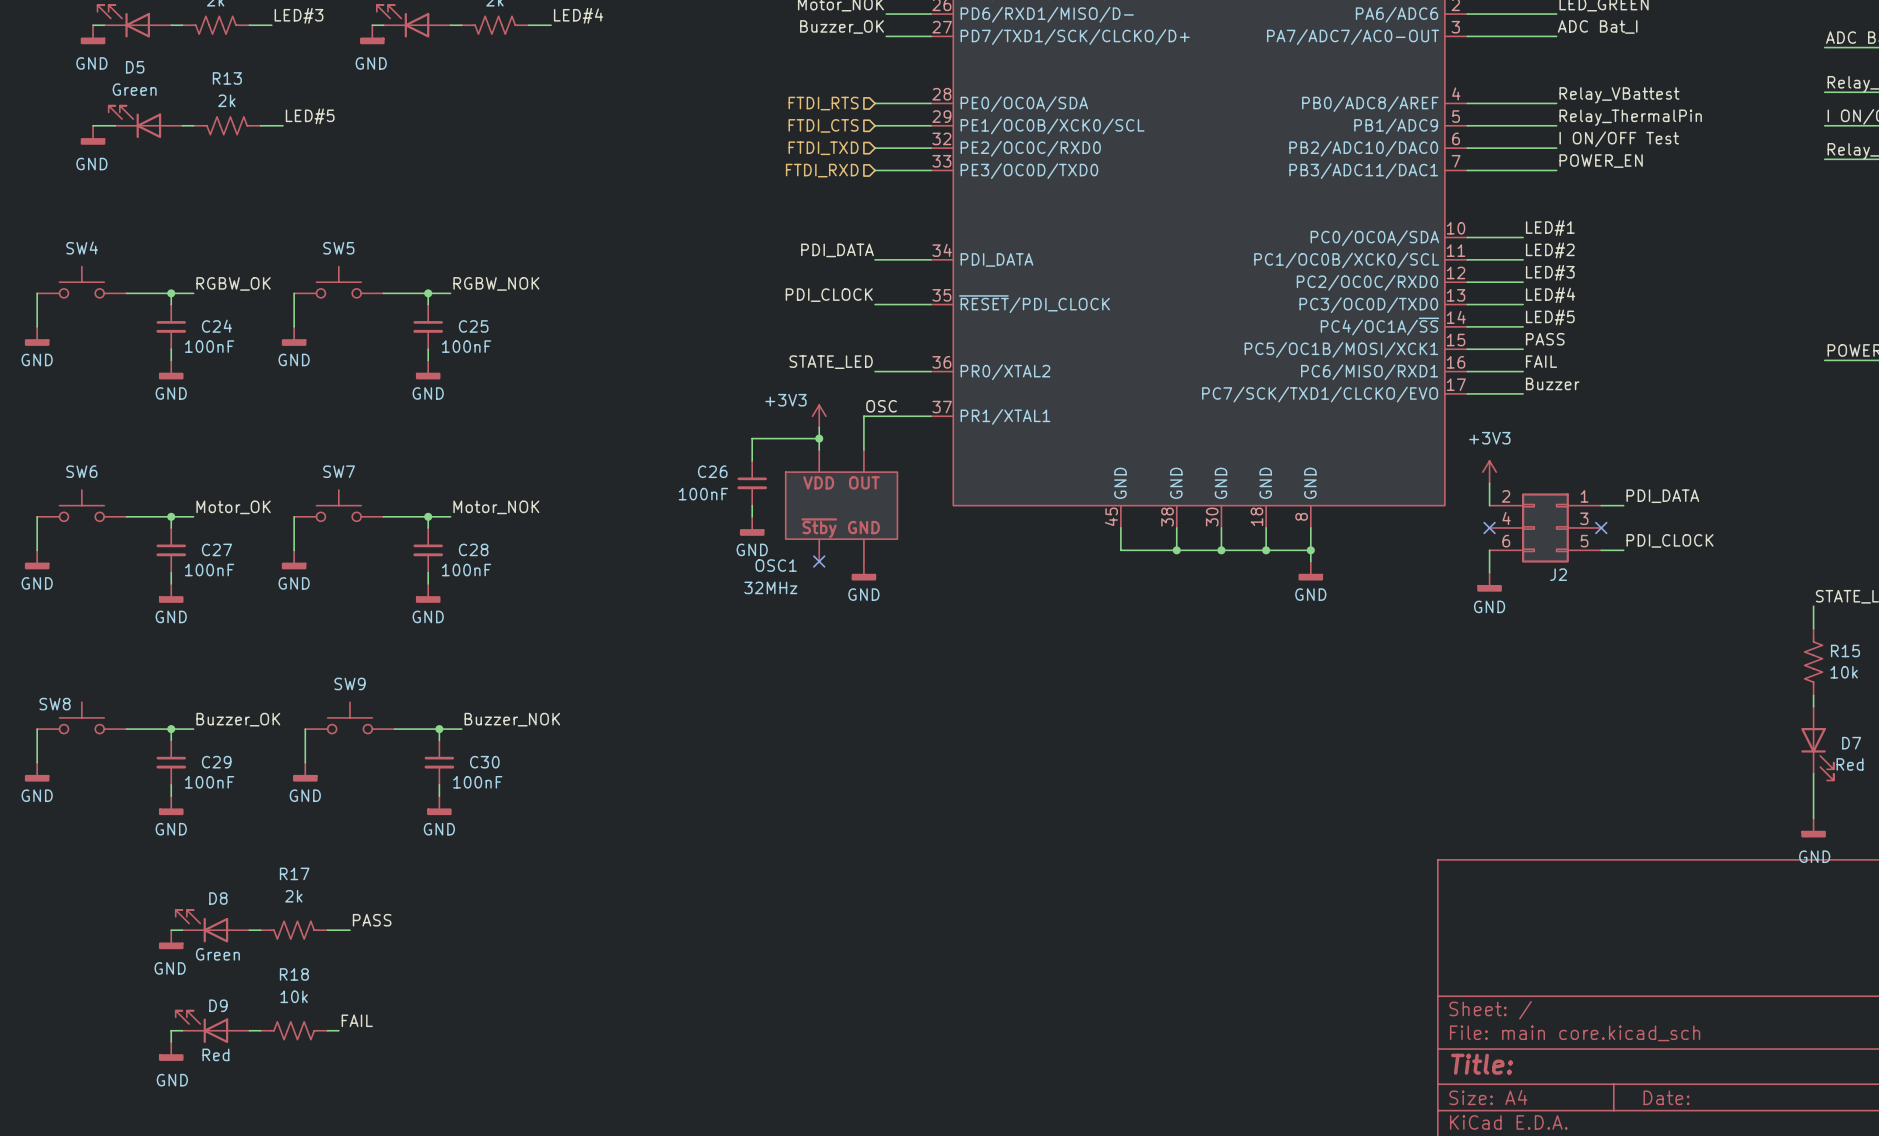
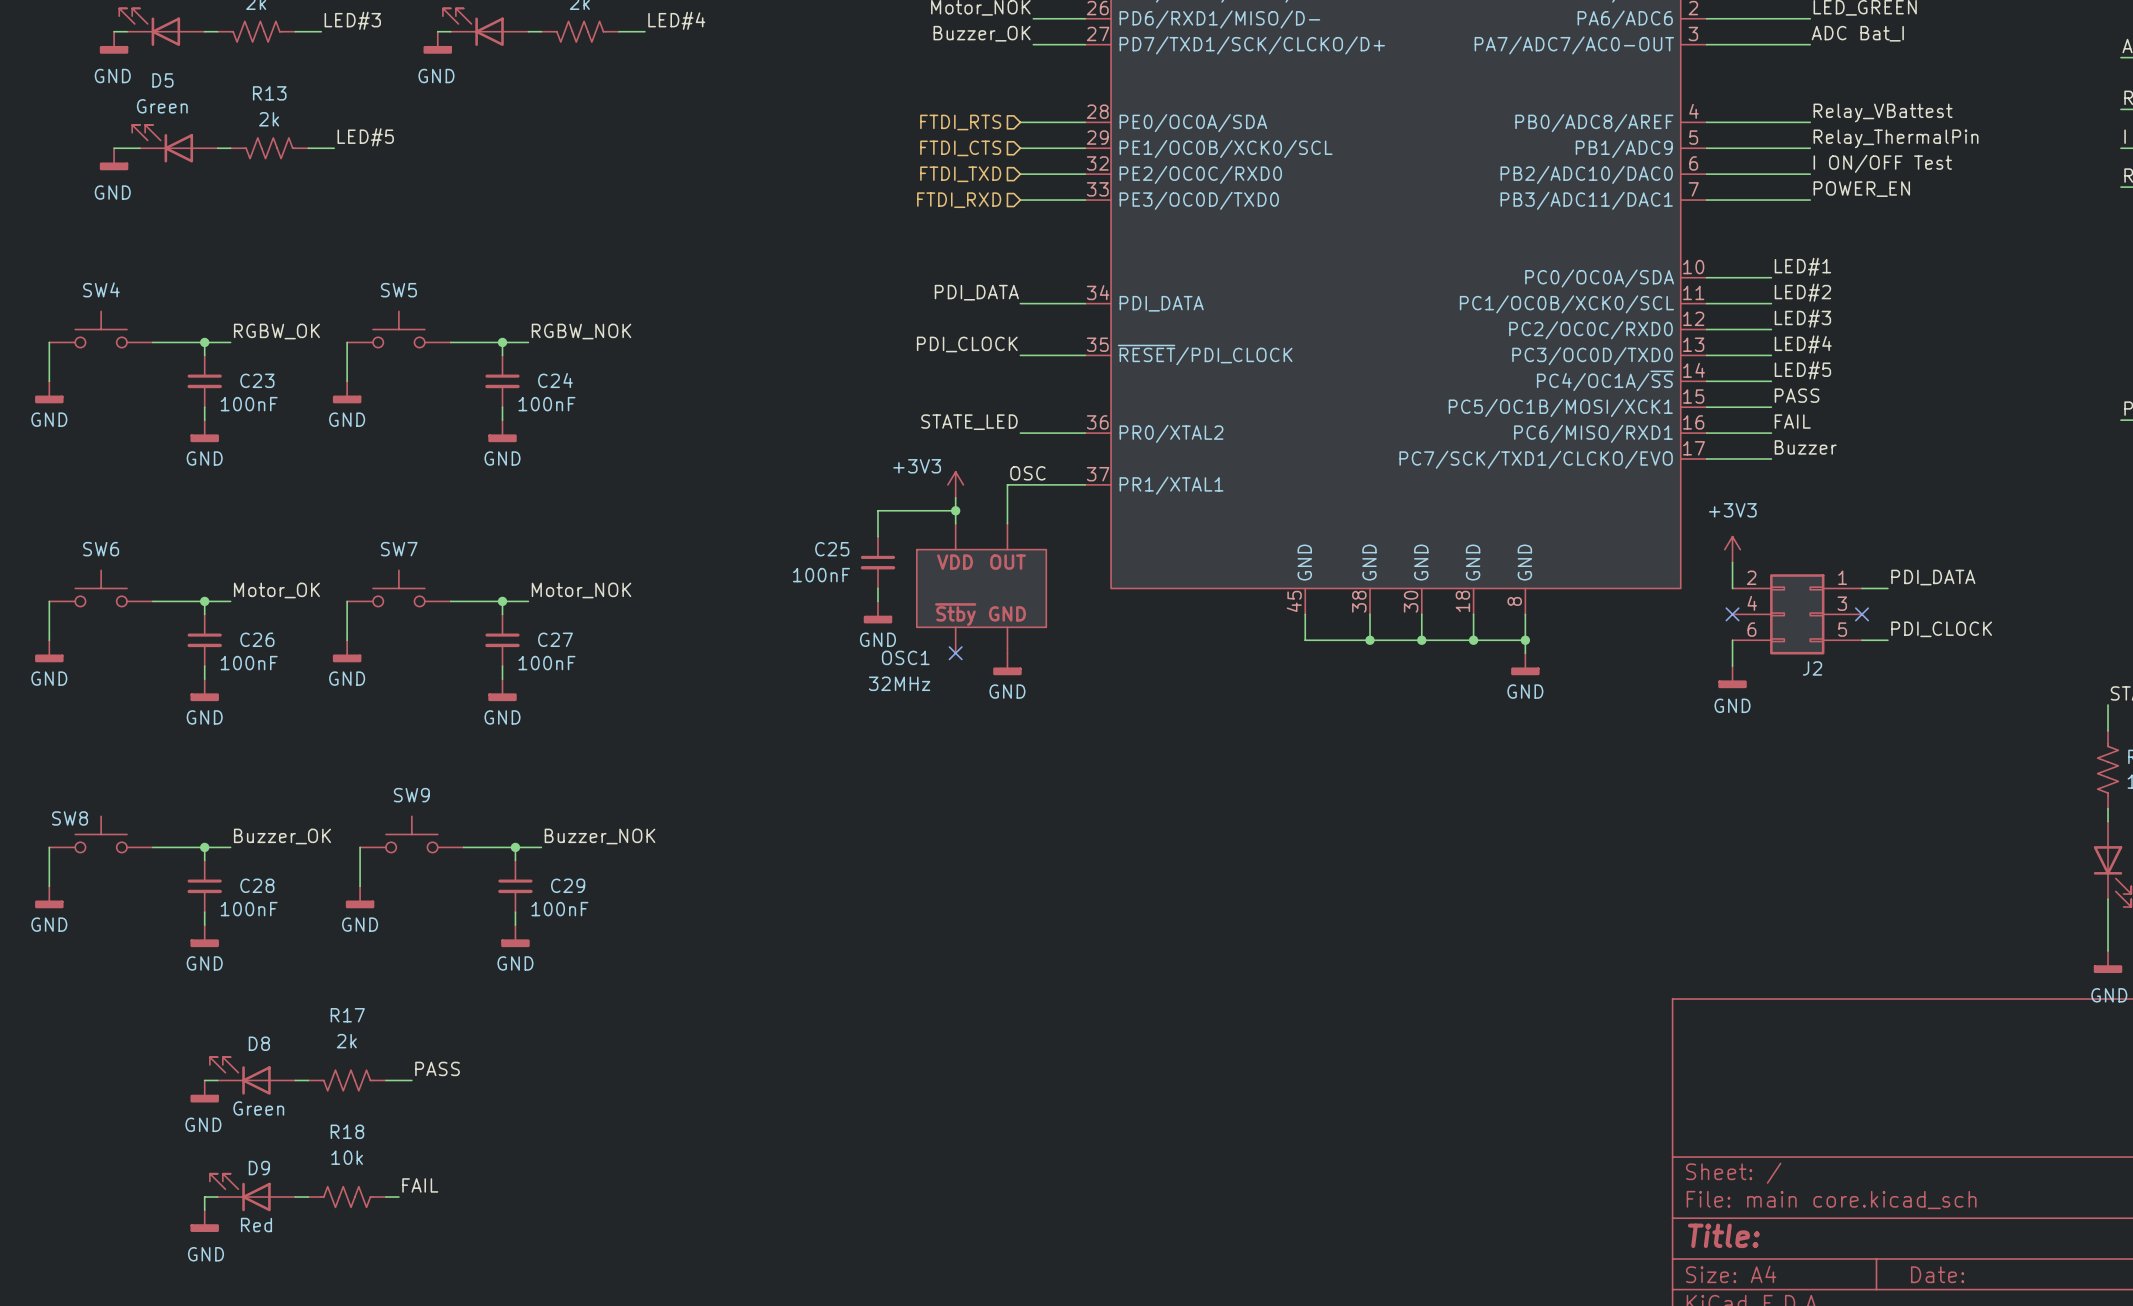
C24 name: C24 (216, 326) -> C23 (257, 380)
C25 name: C25 (473, 326) -> C24 (555, 380)
C26 name: C26 (712, 471) -> C25 (832, 549)
C27 name: C27 (216, 549) -> C26 (257, 639)
C28 name: C28 (473, 549) -> C27 (555, 639)
C29 name: C29 (216, 762) -> C28 (257, 885)
C30 name: C30 (484, 762) -> C29 (568, 885)

